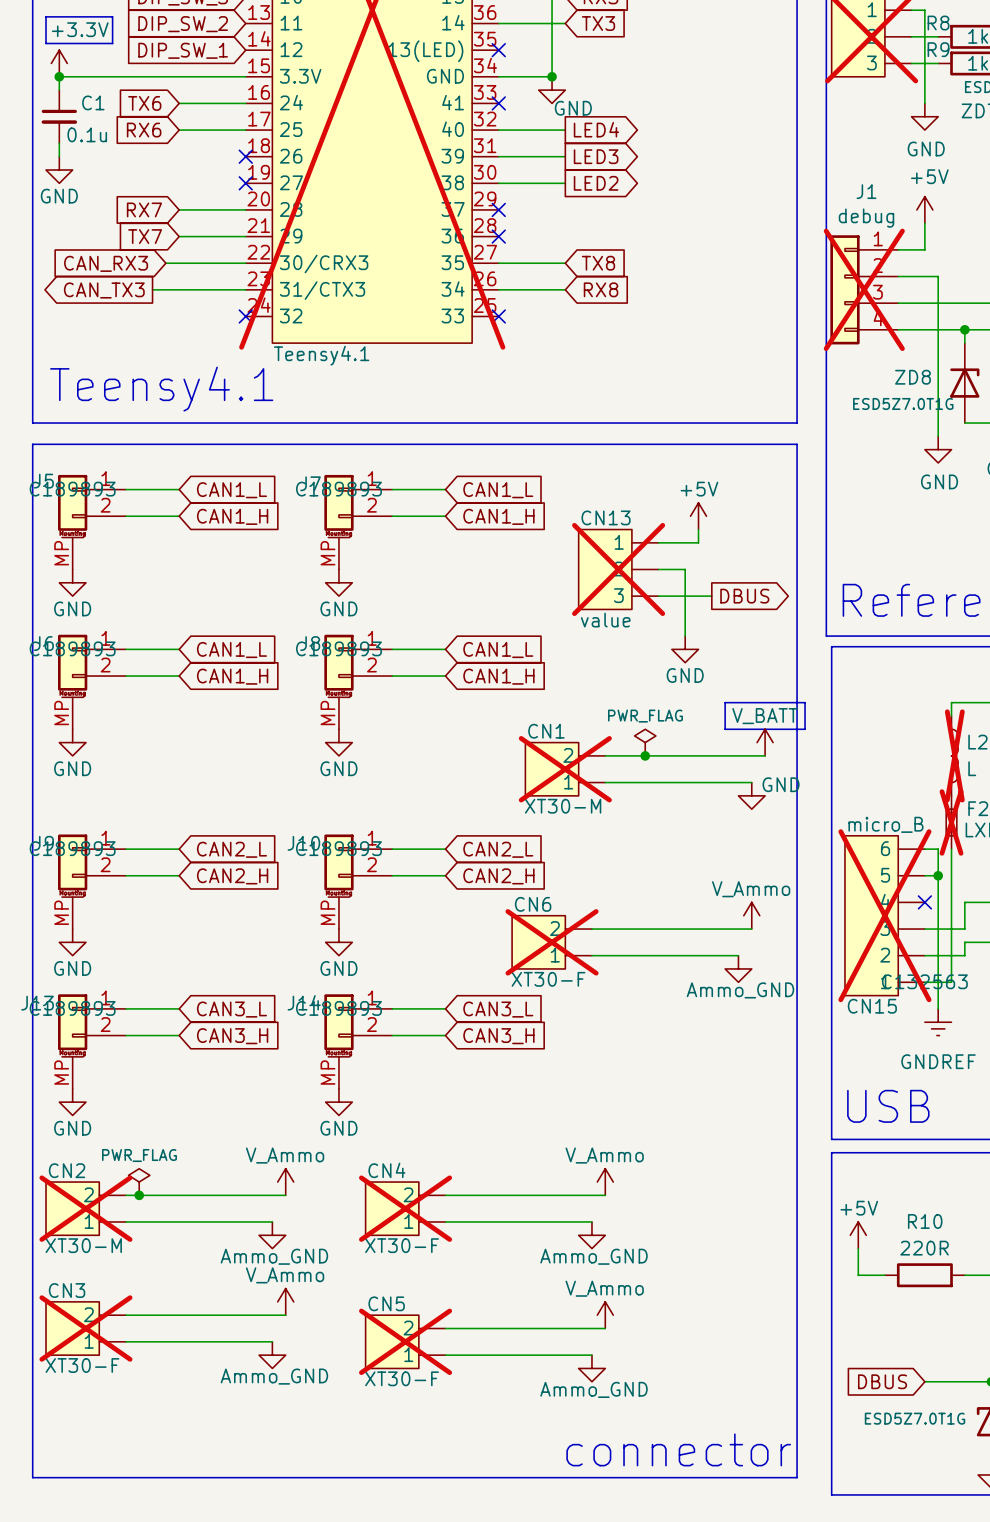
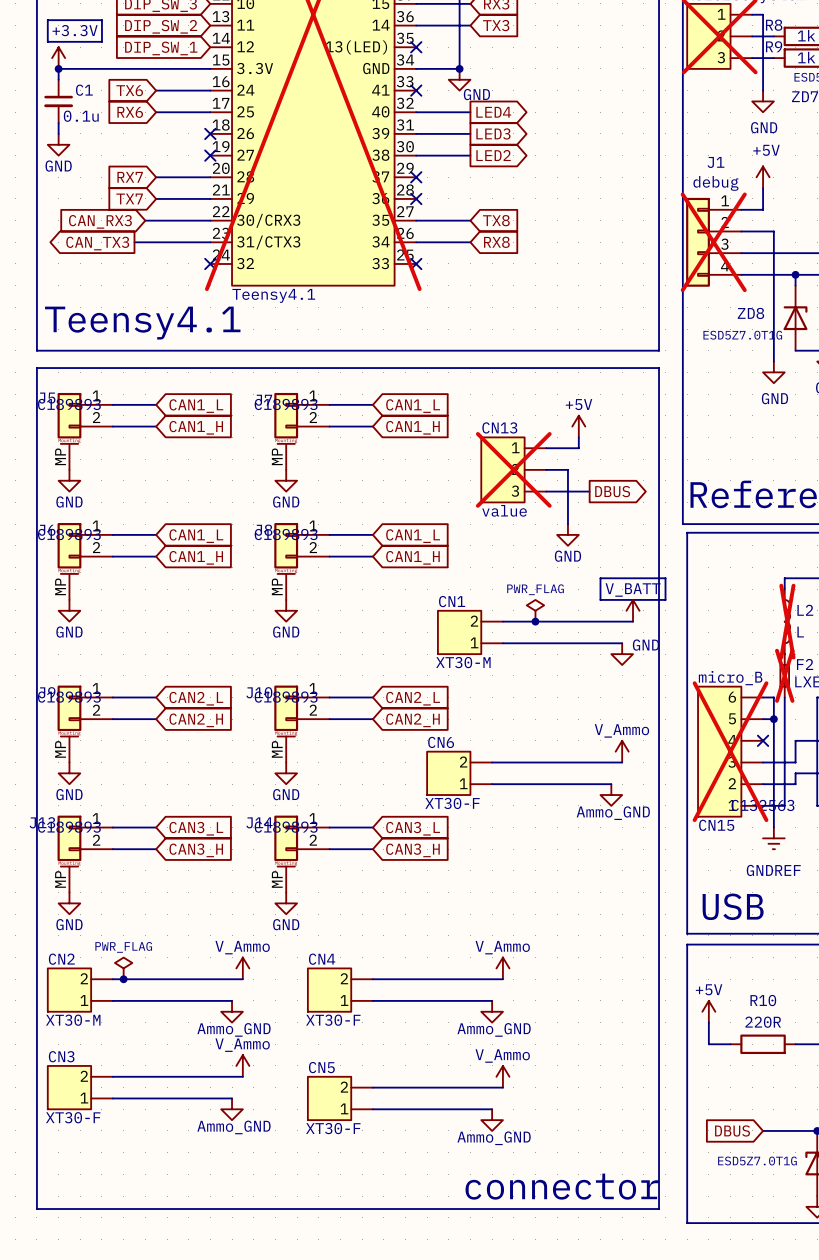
CN1 do-not-place cross: (565, 769) -> none
CN6 do-not-place cross: (552, 942) -> none
CN2 do-not-place cross: (85, 1208) -> none
CN4 do-not-place cross: (405, 1208) -> none
CN3 do-not-place cross: (85, 1328) -> none
CN5 do-not-place cross: (405, 1341) -> none

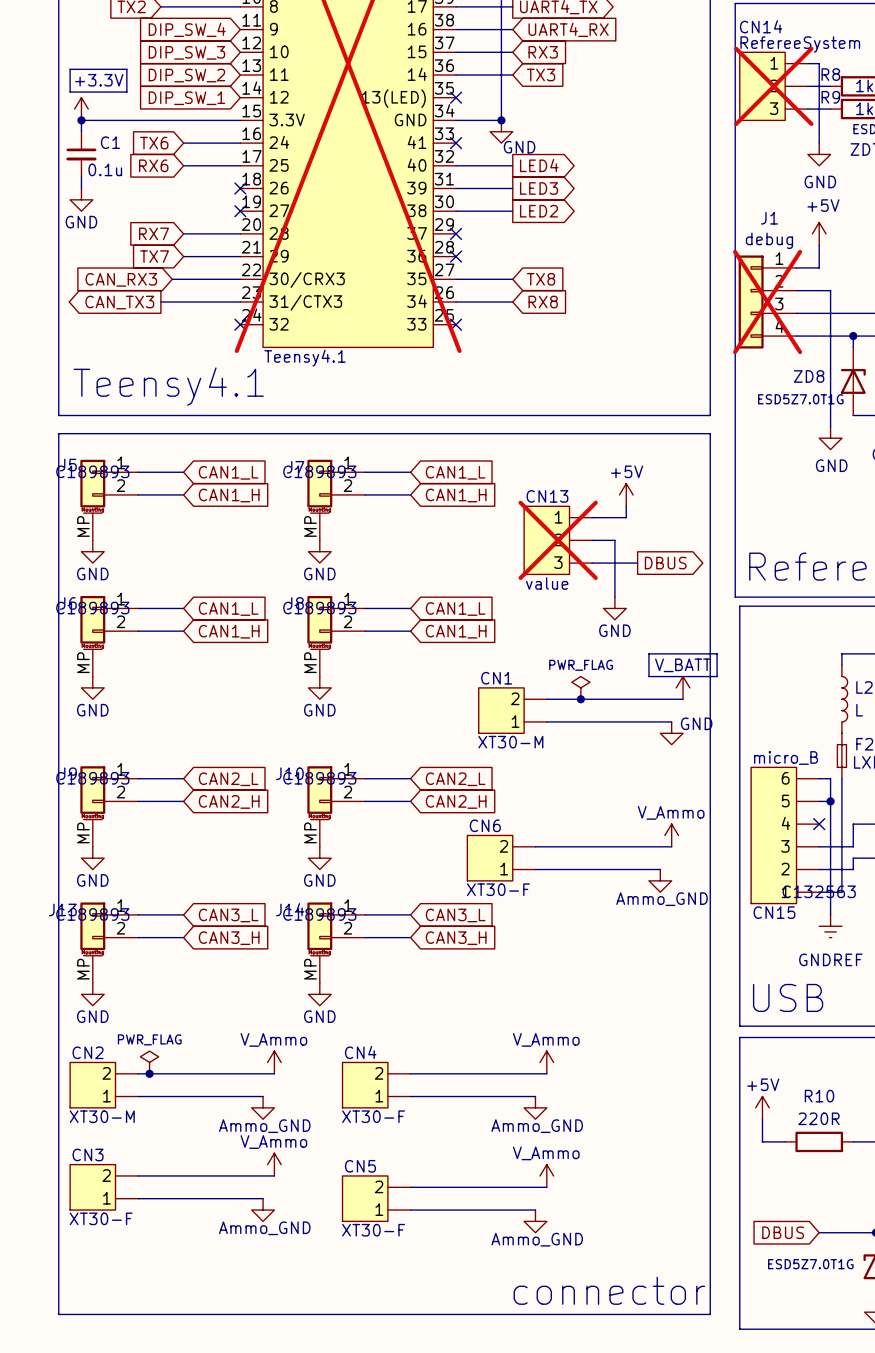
L2 do-not-place cross: (787, 621) -> none
F2 do-not-place cross: (784, 675) -> none
CN15 do-not-place cross: (730, 751) -> none

